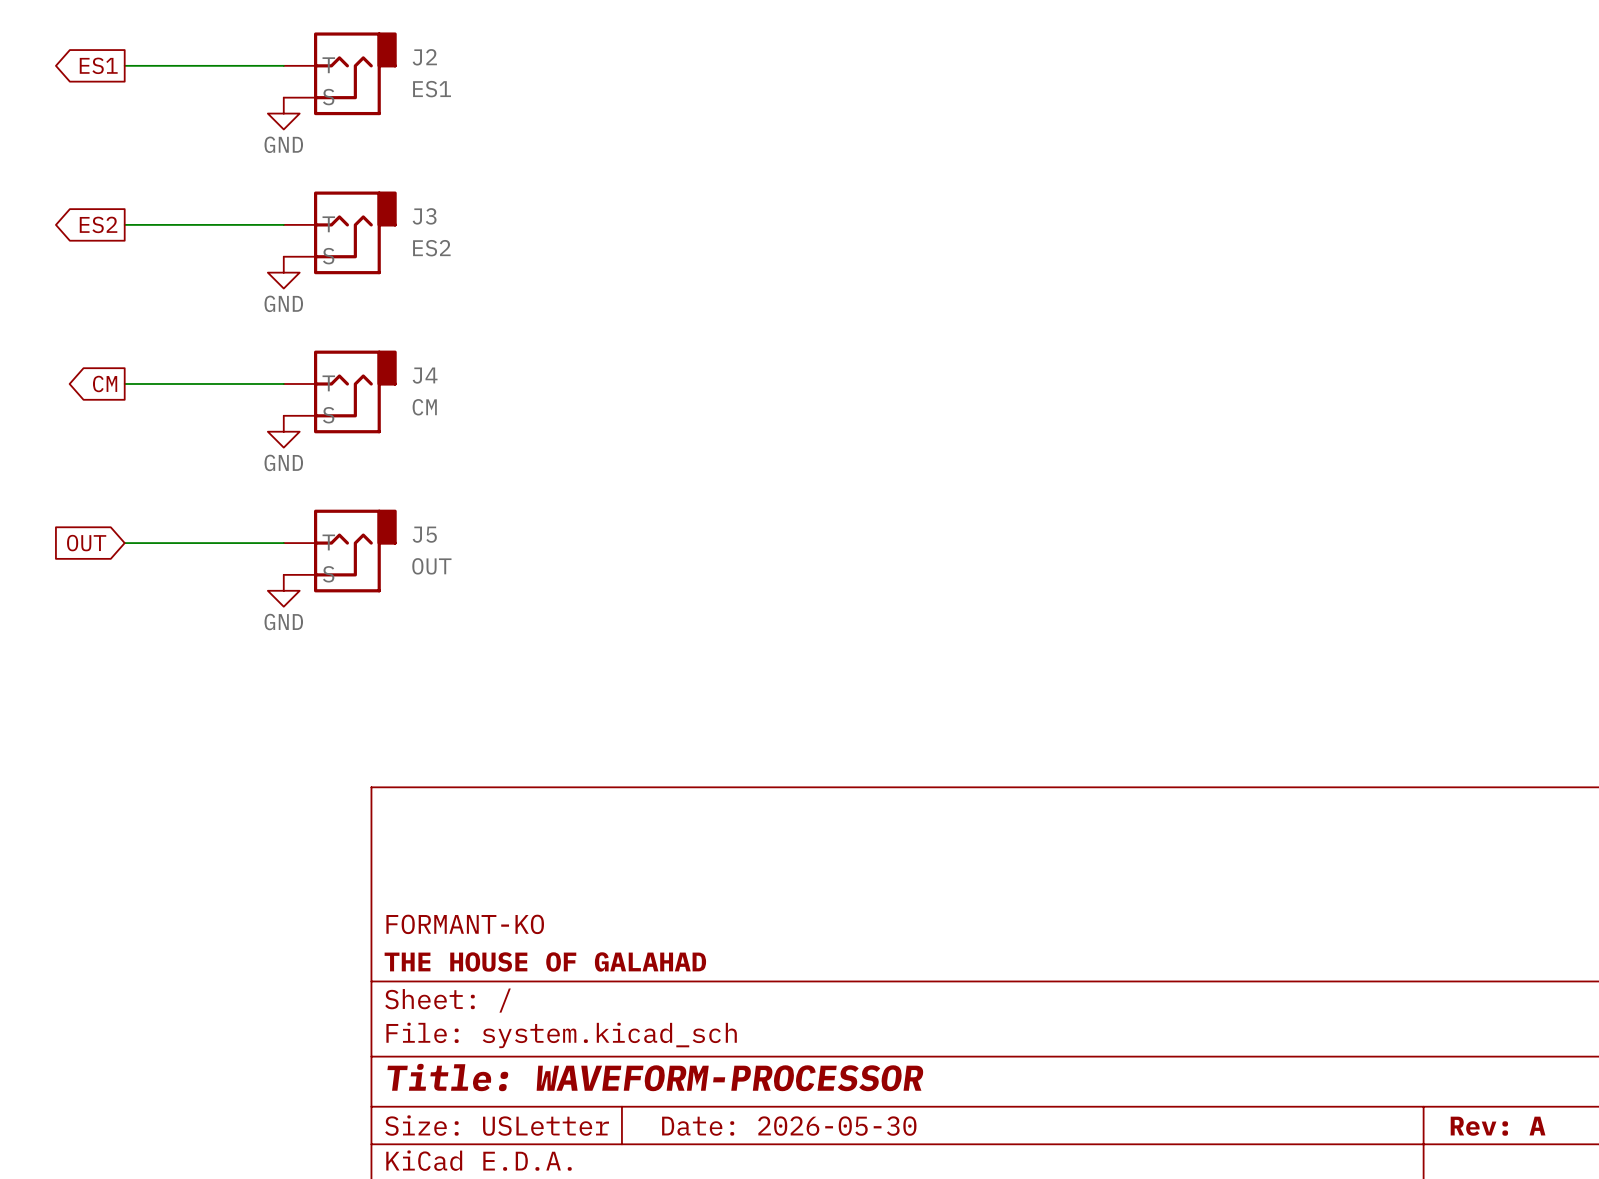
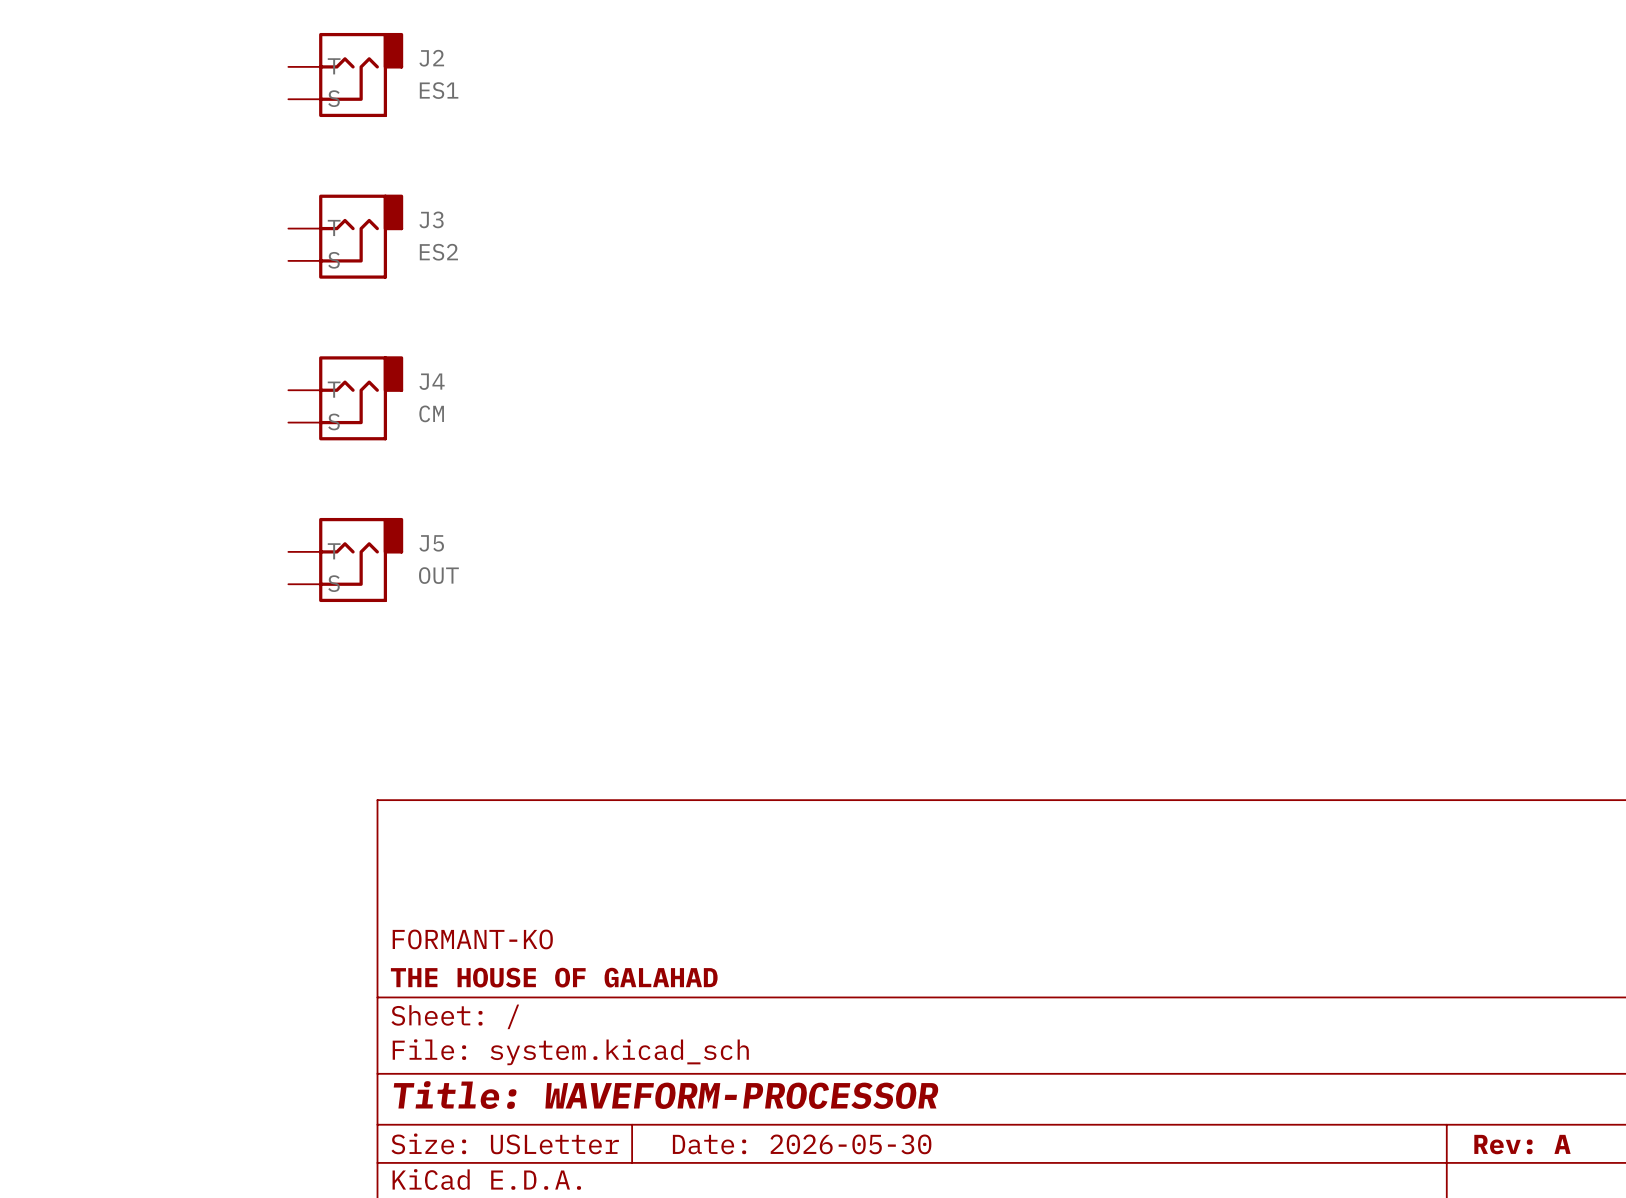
global label: ES1 (98, 65) -> none
wire: (124, 65) (283, 65) -> none
power symbol: GND (283, 113) -> none
global label: ES2 (98, 224) -> none
wire: (124, 224) (283, 224) -> none
power symbol: GND (283, 272) -> none
global label: CM (105, 383) -> none
wire: (124, 383) (283, 383) -> none
power symbol: GND (283, 431) -> none
global label: OUT (86, 543) -> none
wire: (124, 543) (283, 543) -> none
power symbol: GND (283, 590) -> none

